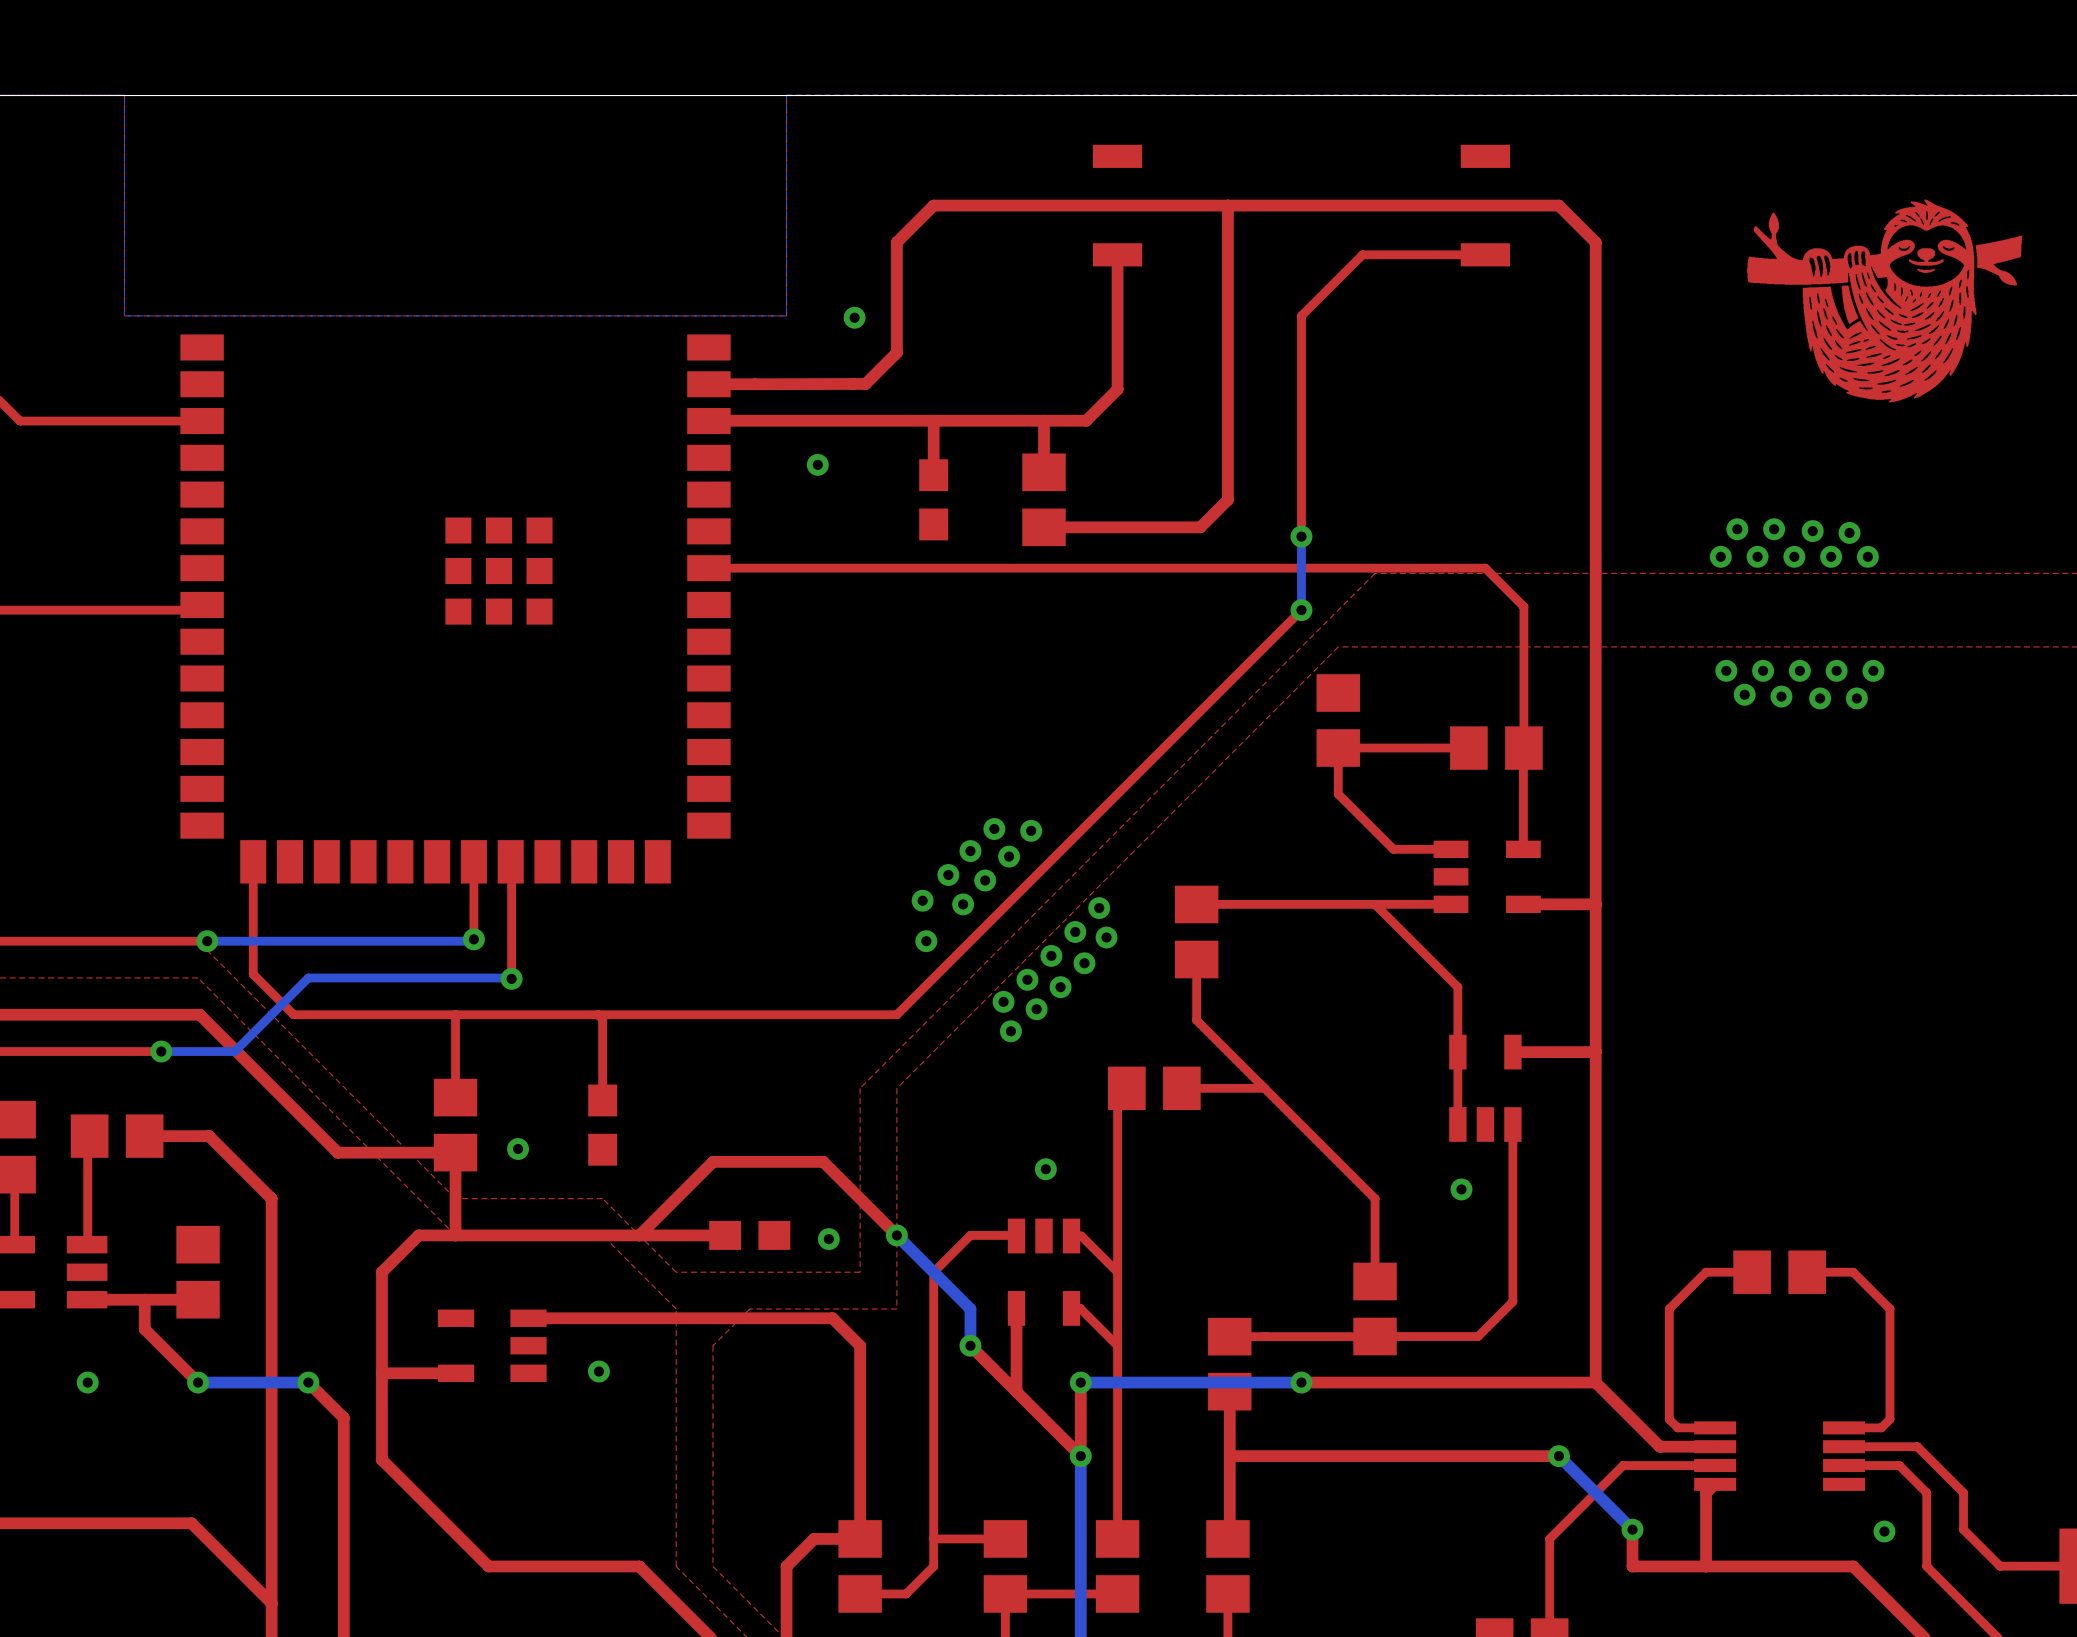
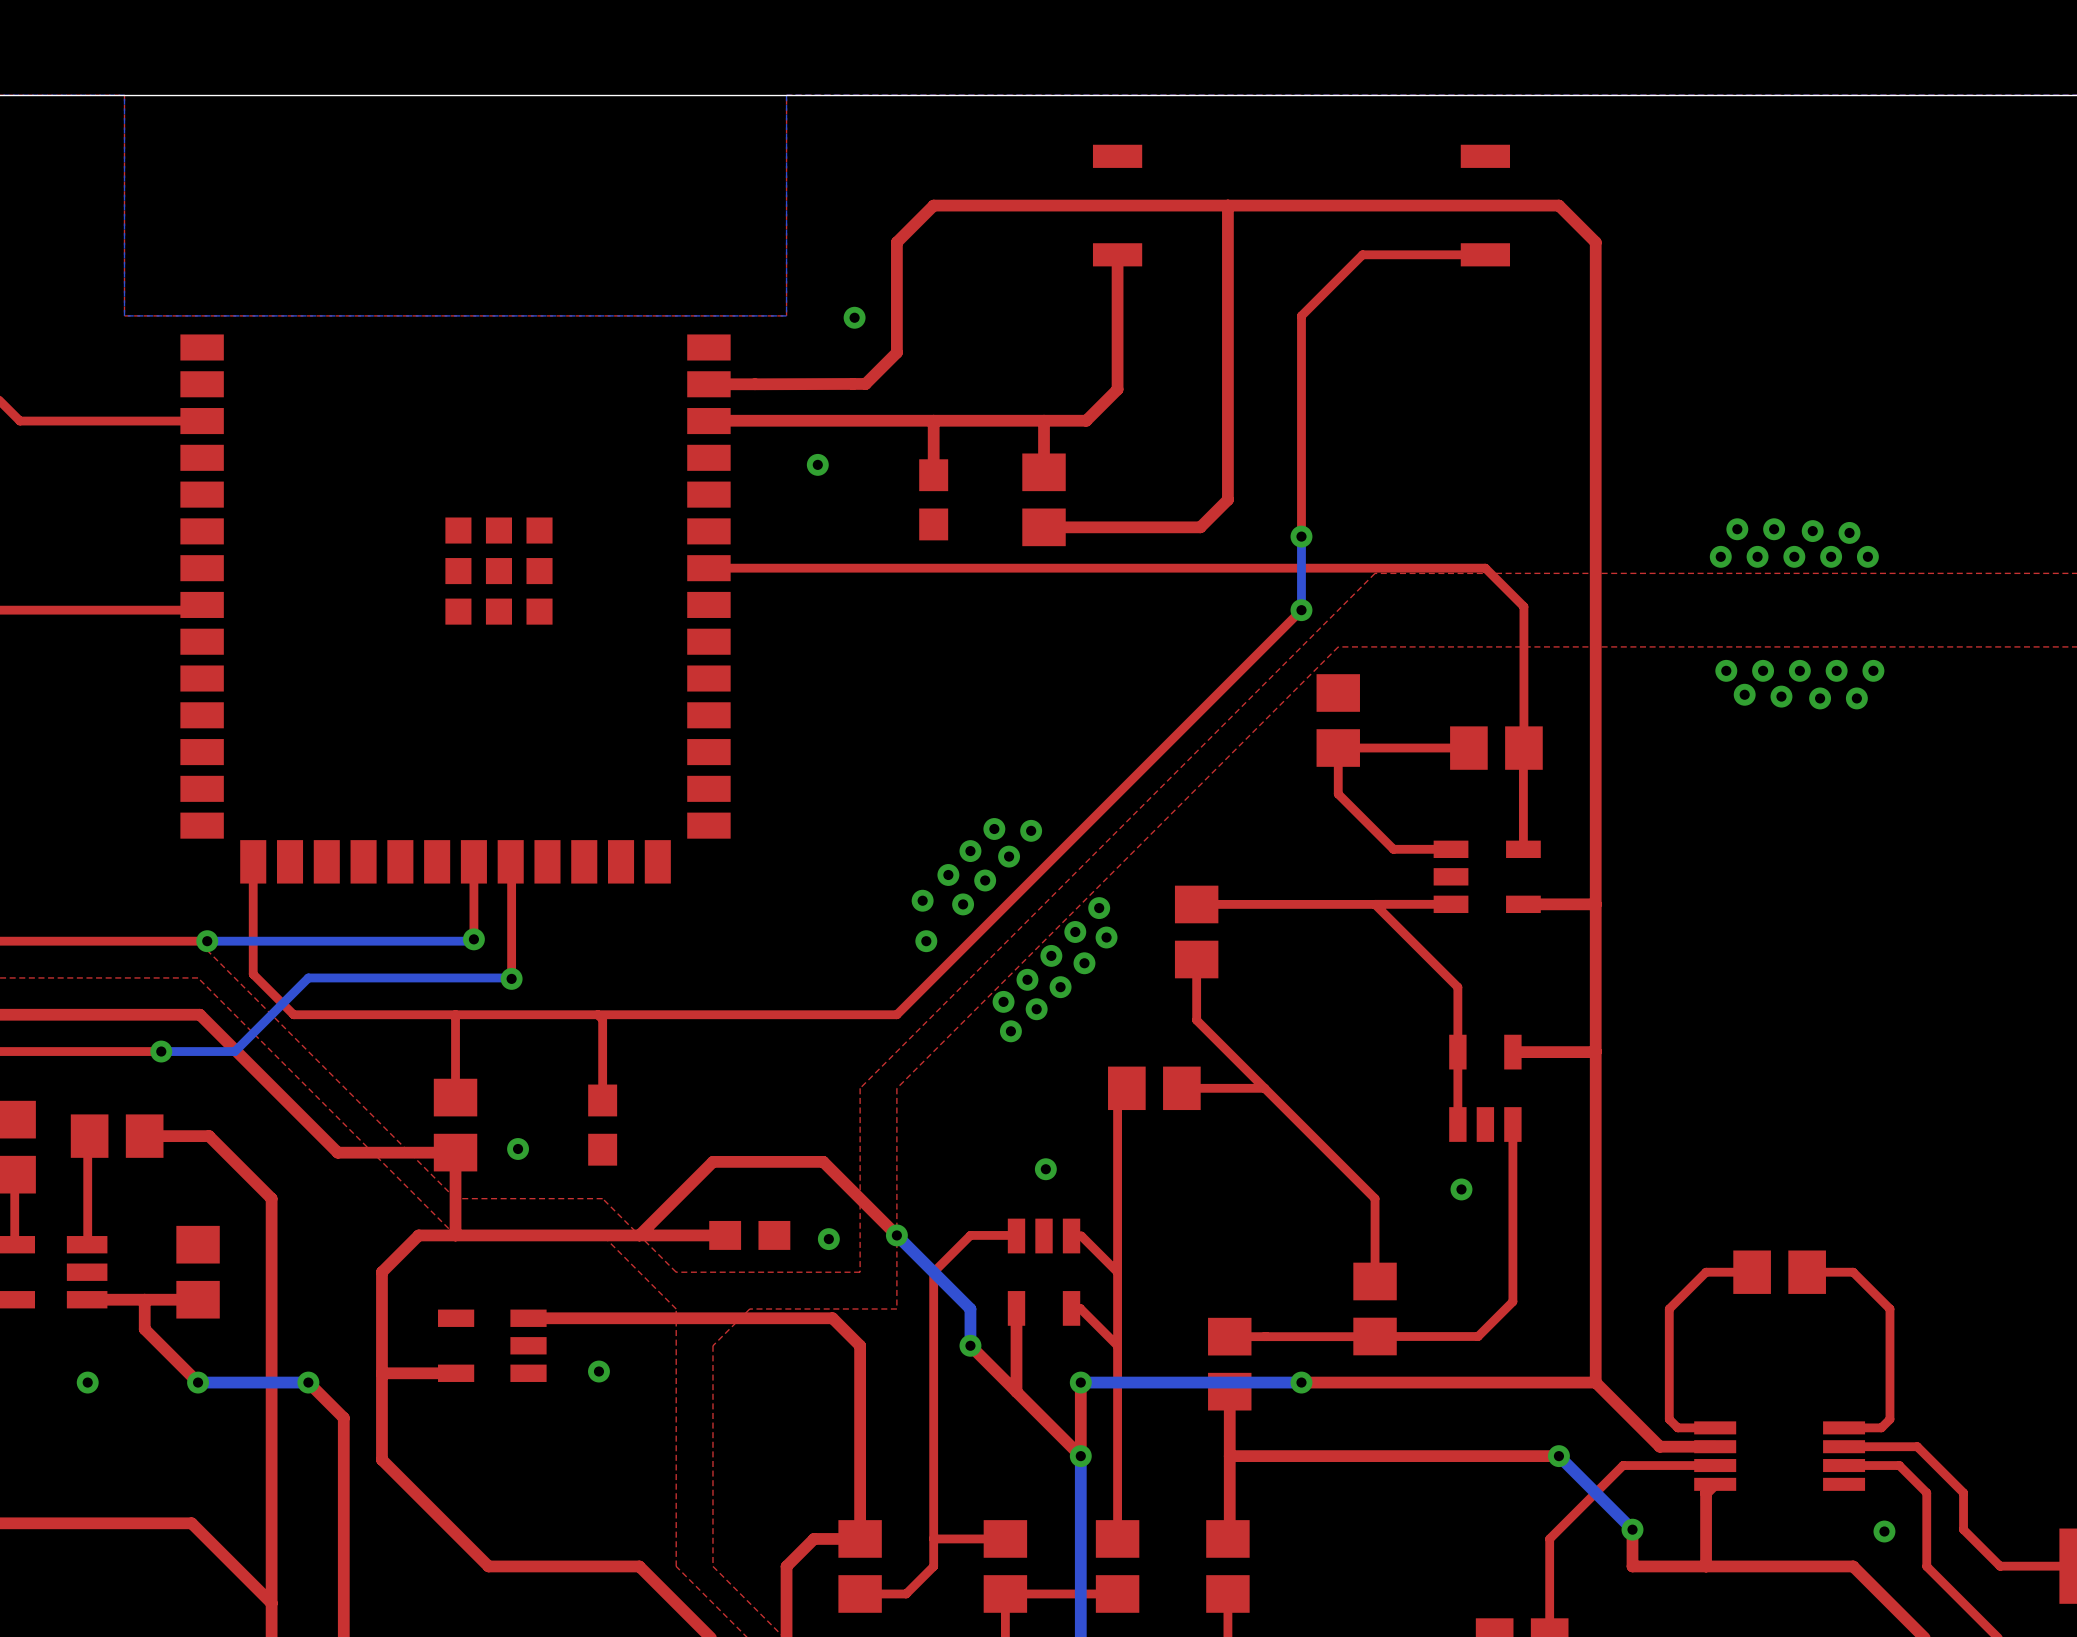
drawing: [1747, 199, 2023, 403] -> none

